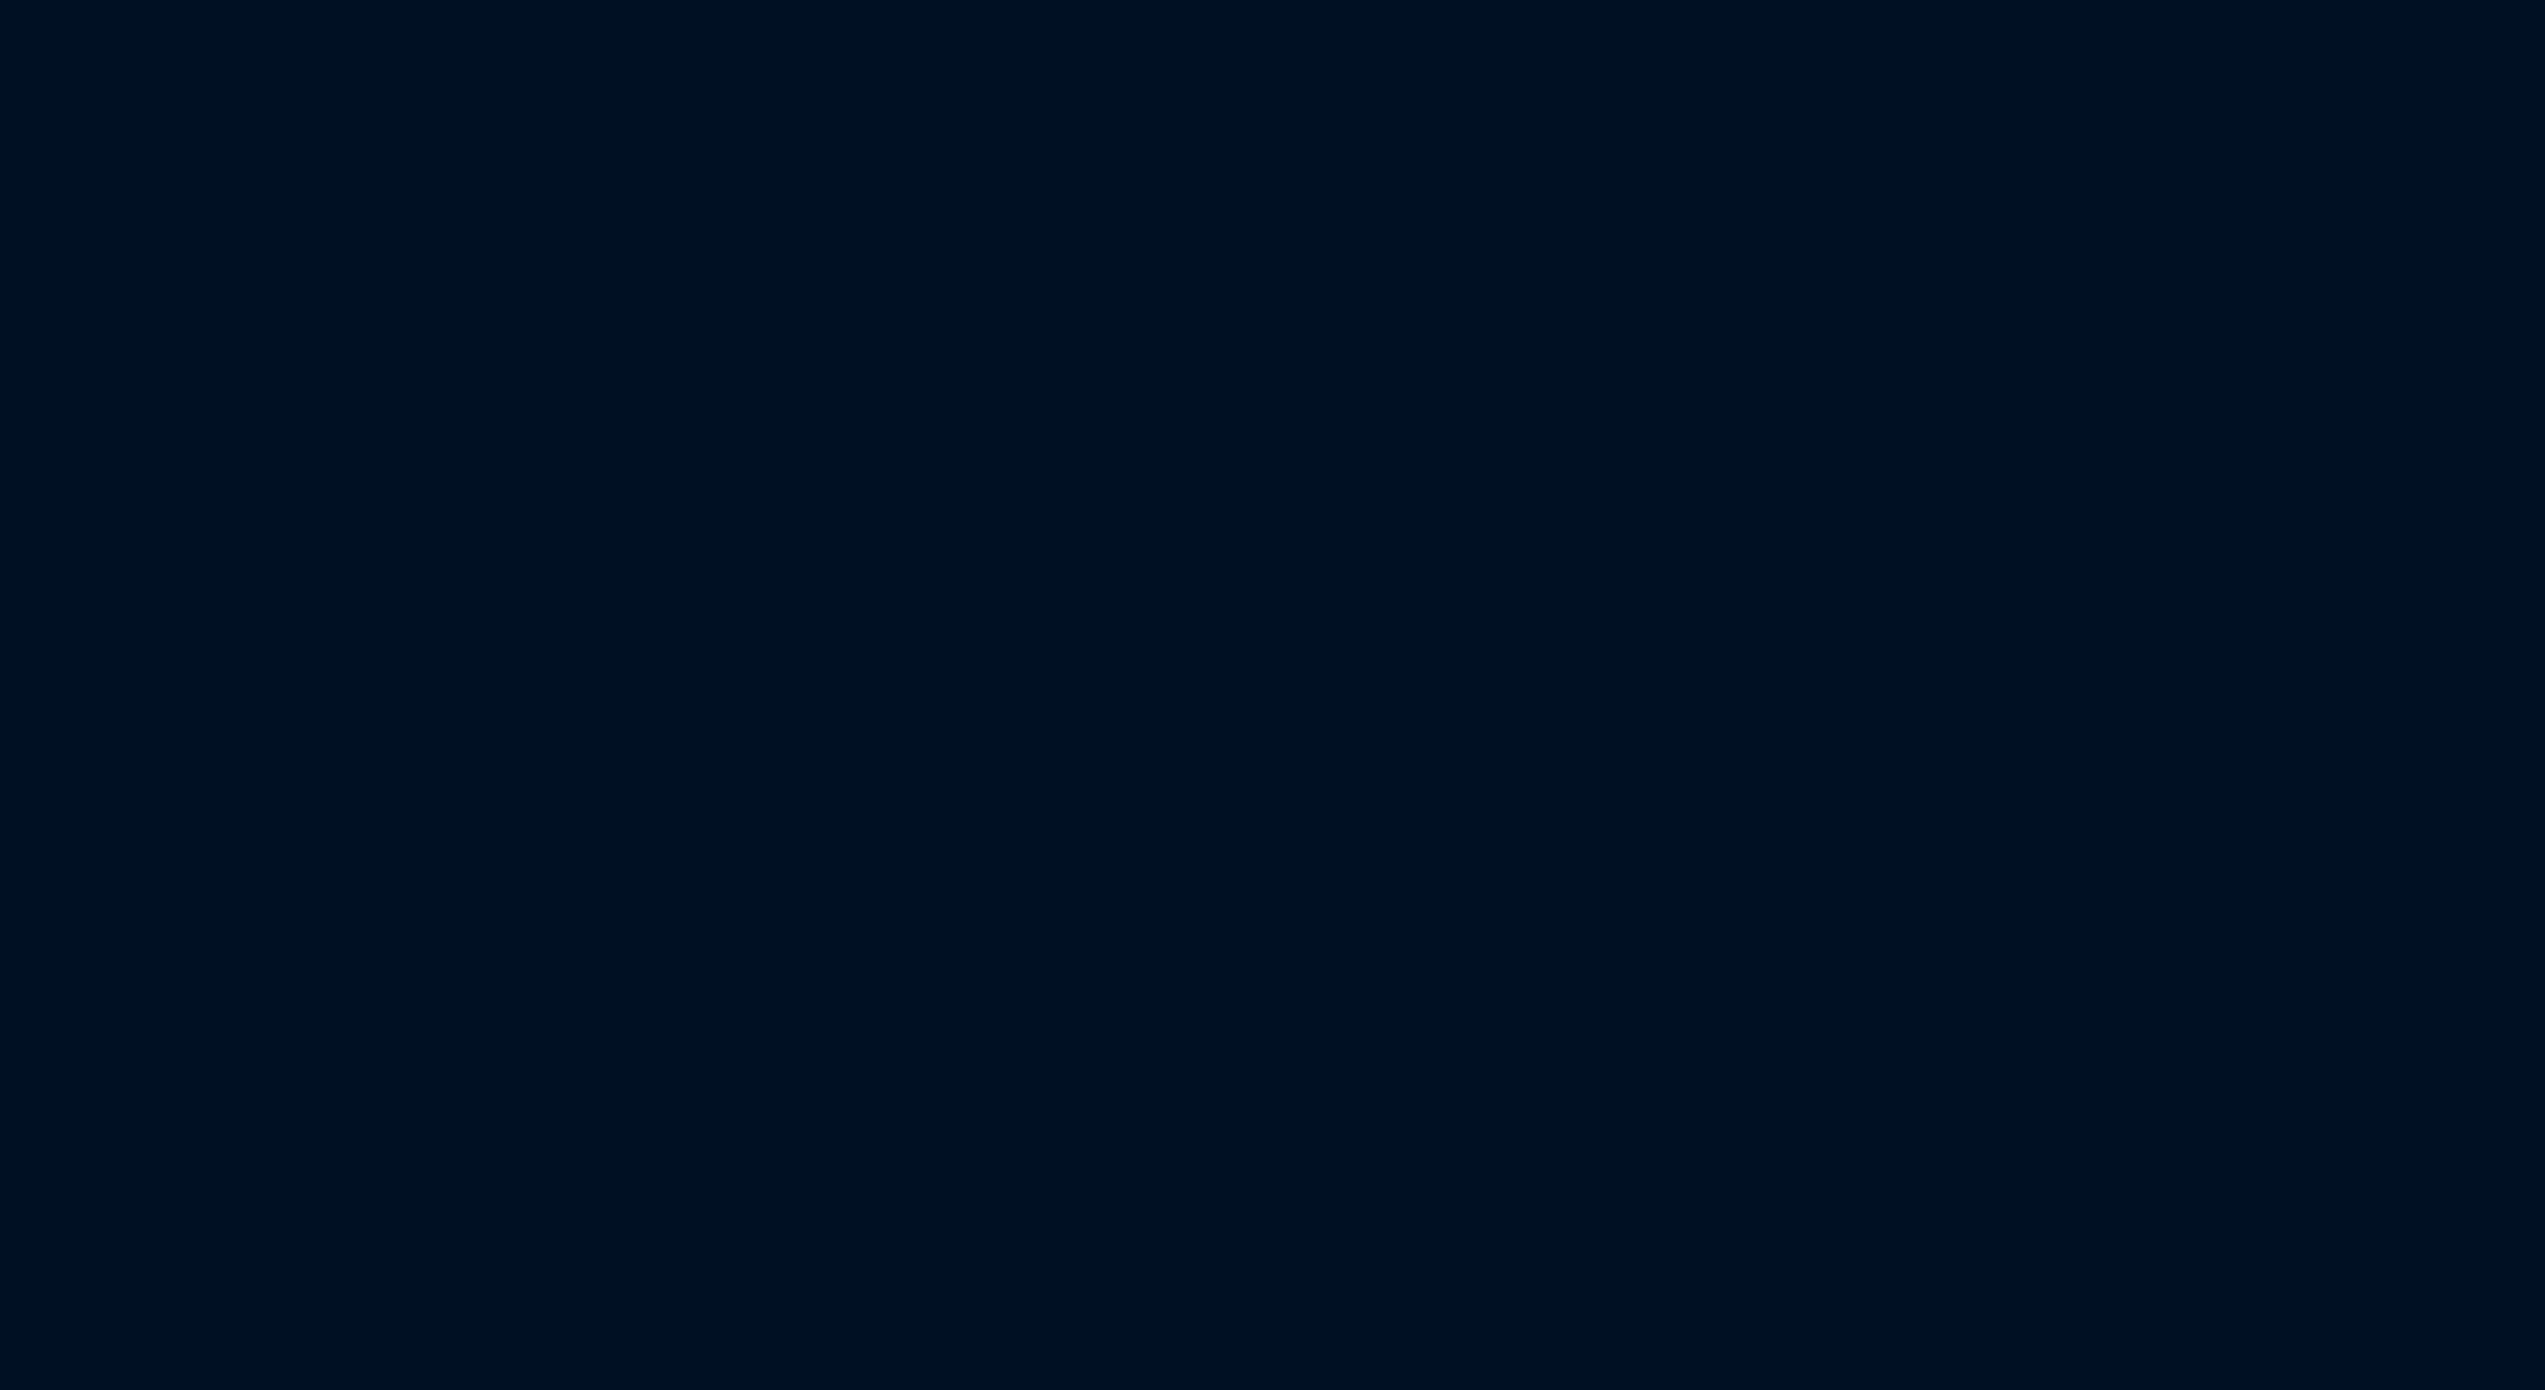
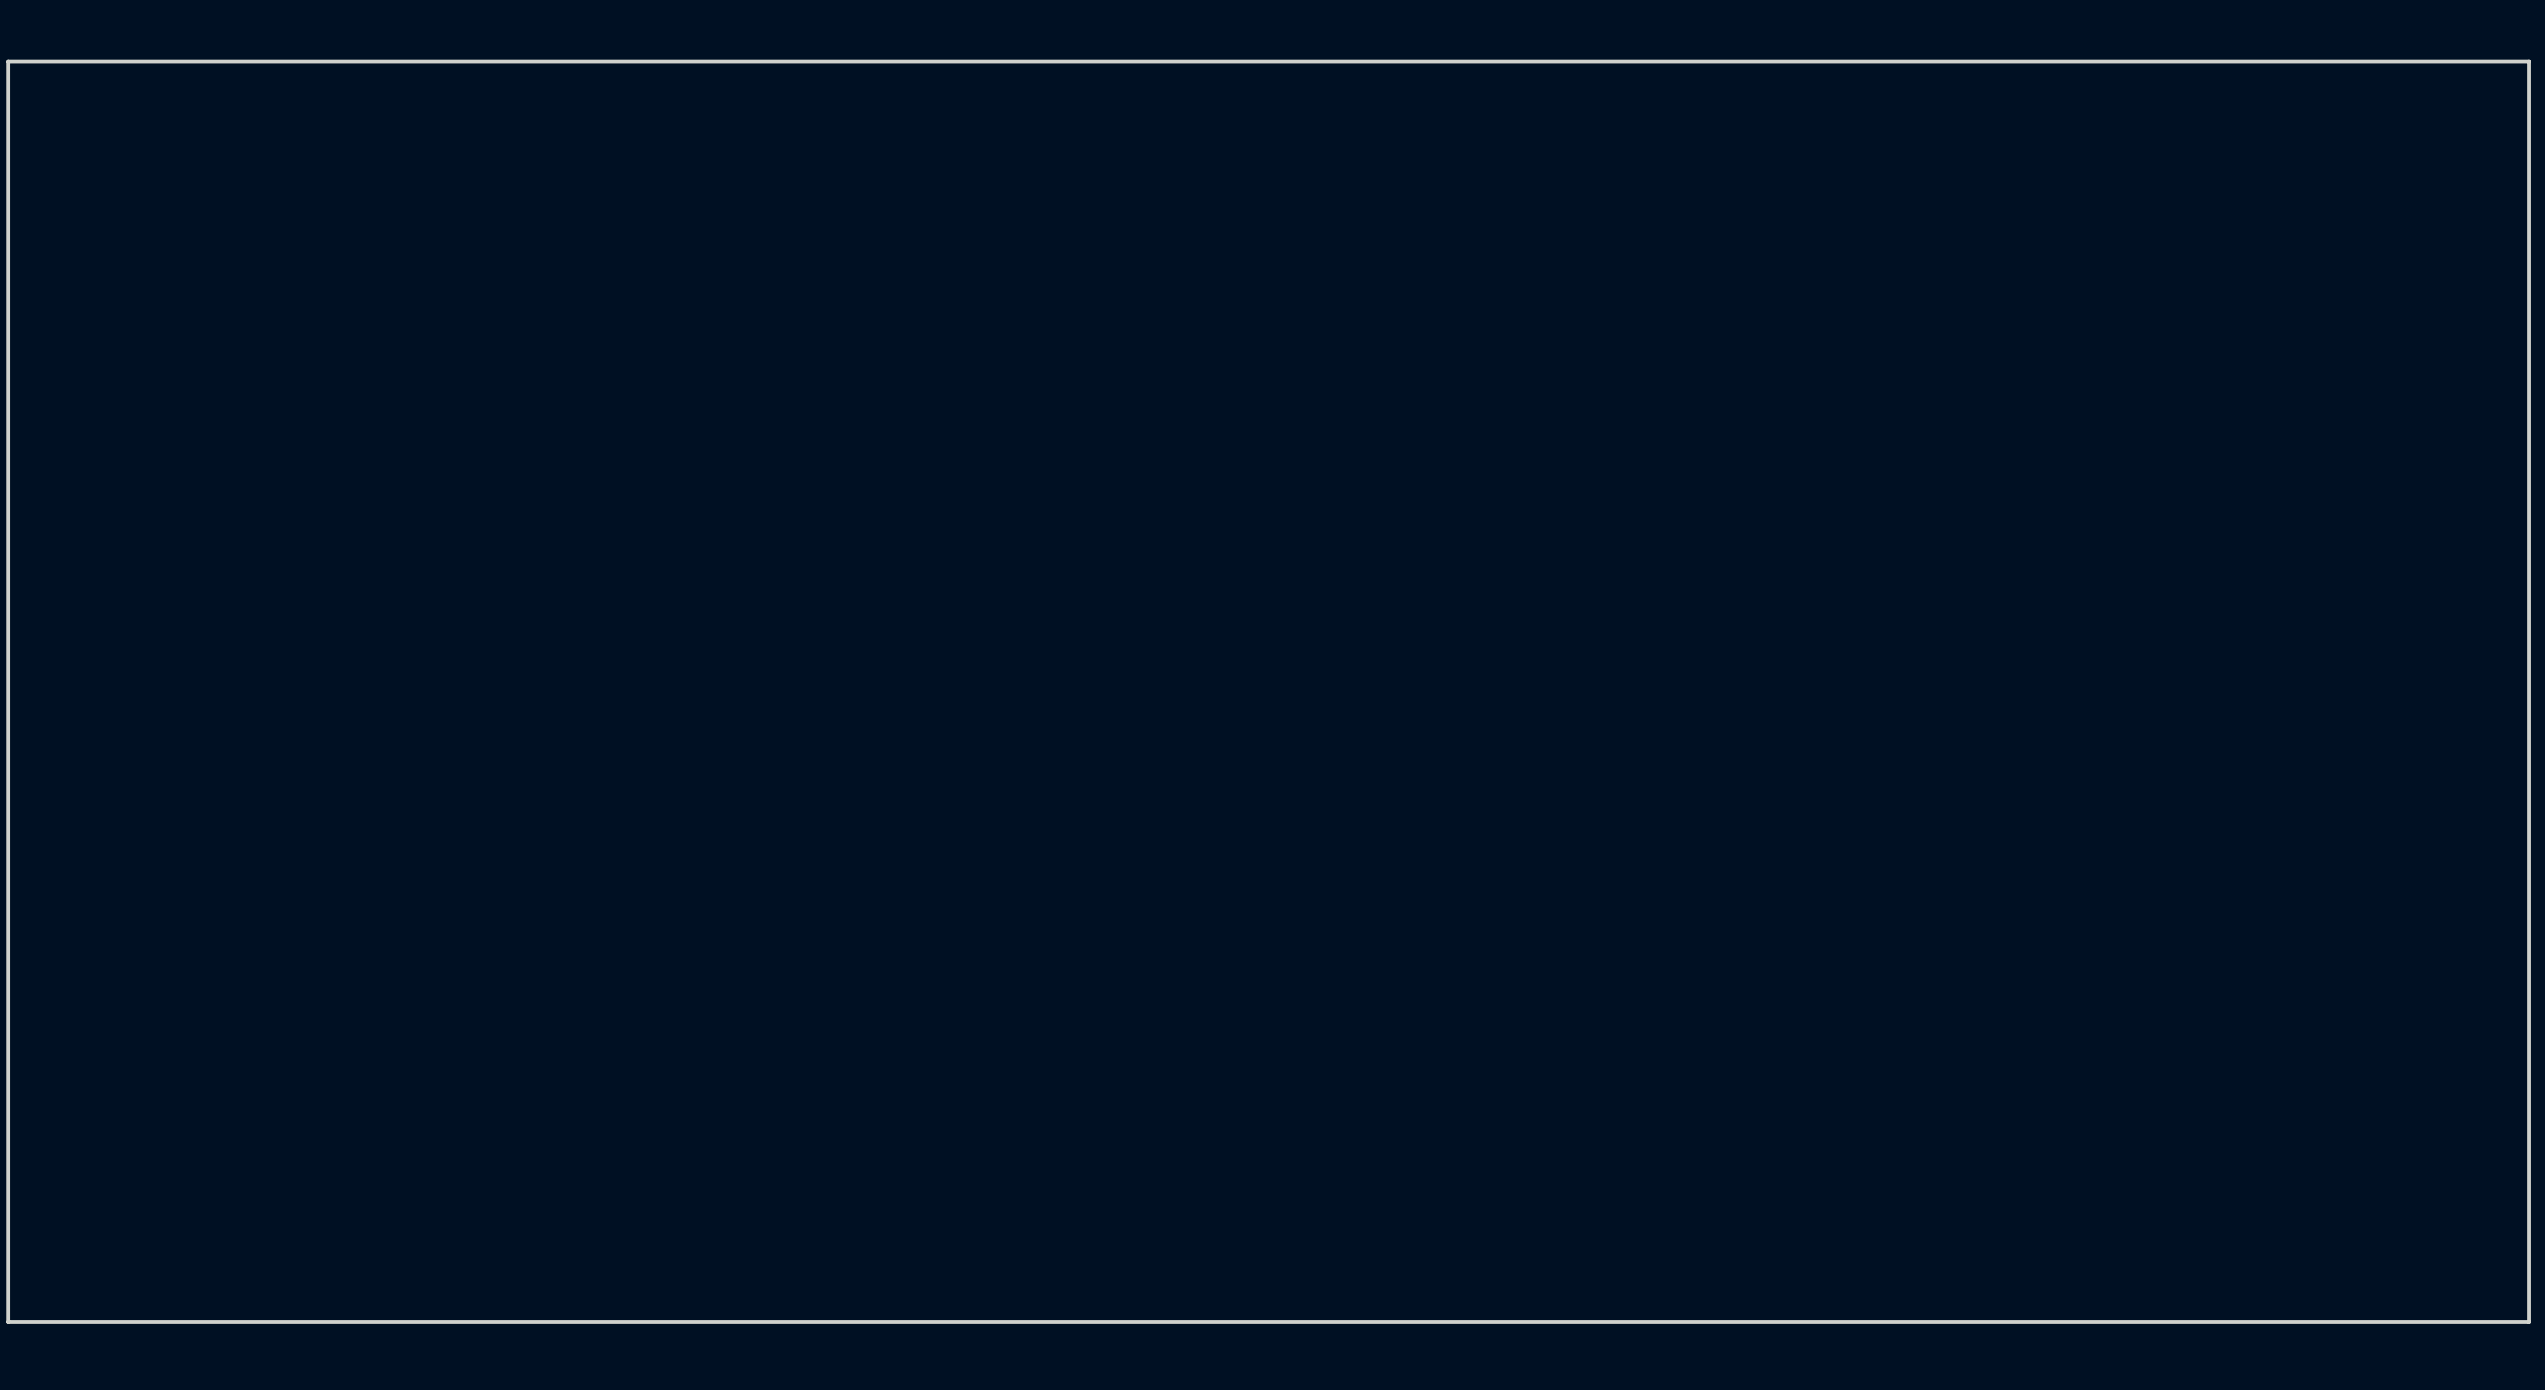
board edge: none -> (8, 61) (2529, 61) (2529, 1321) (8, 1321) (8, 61)

